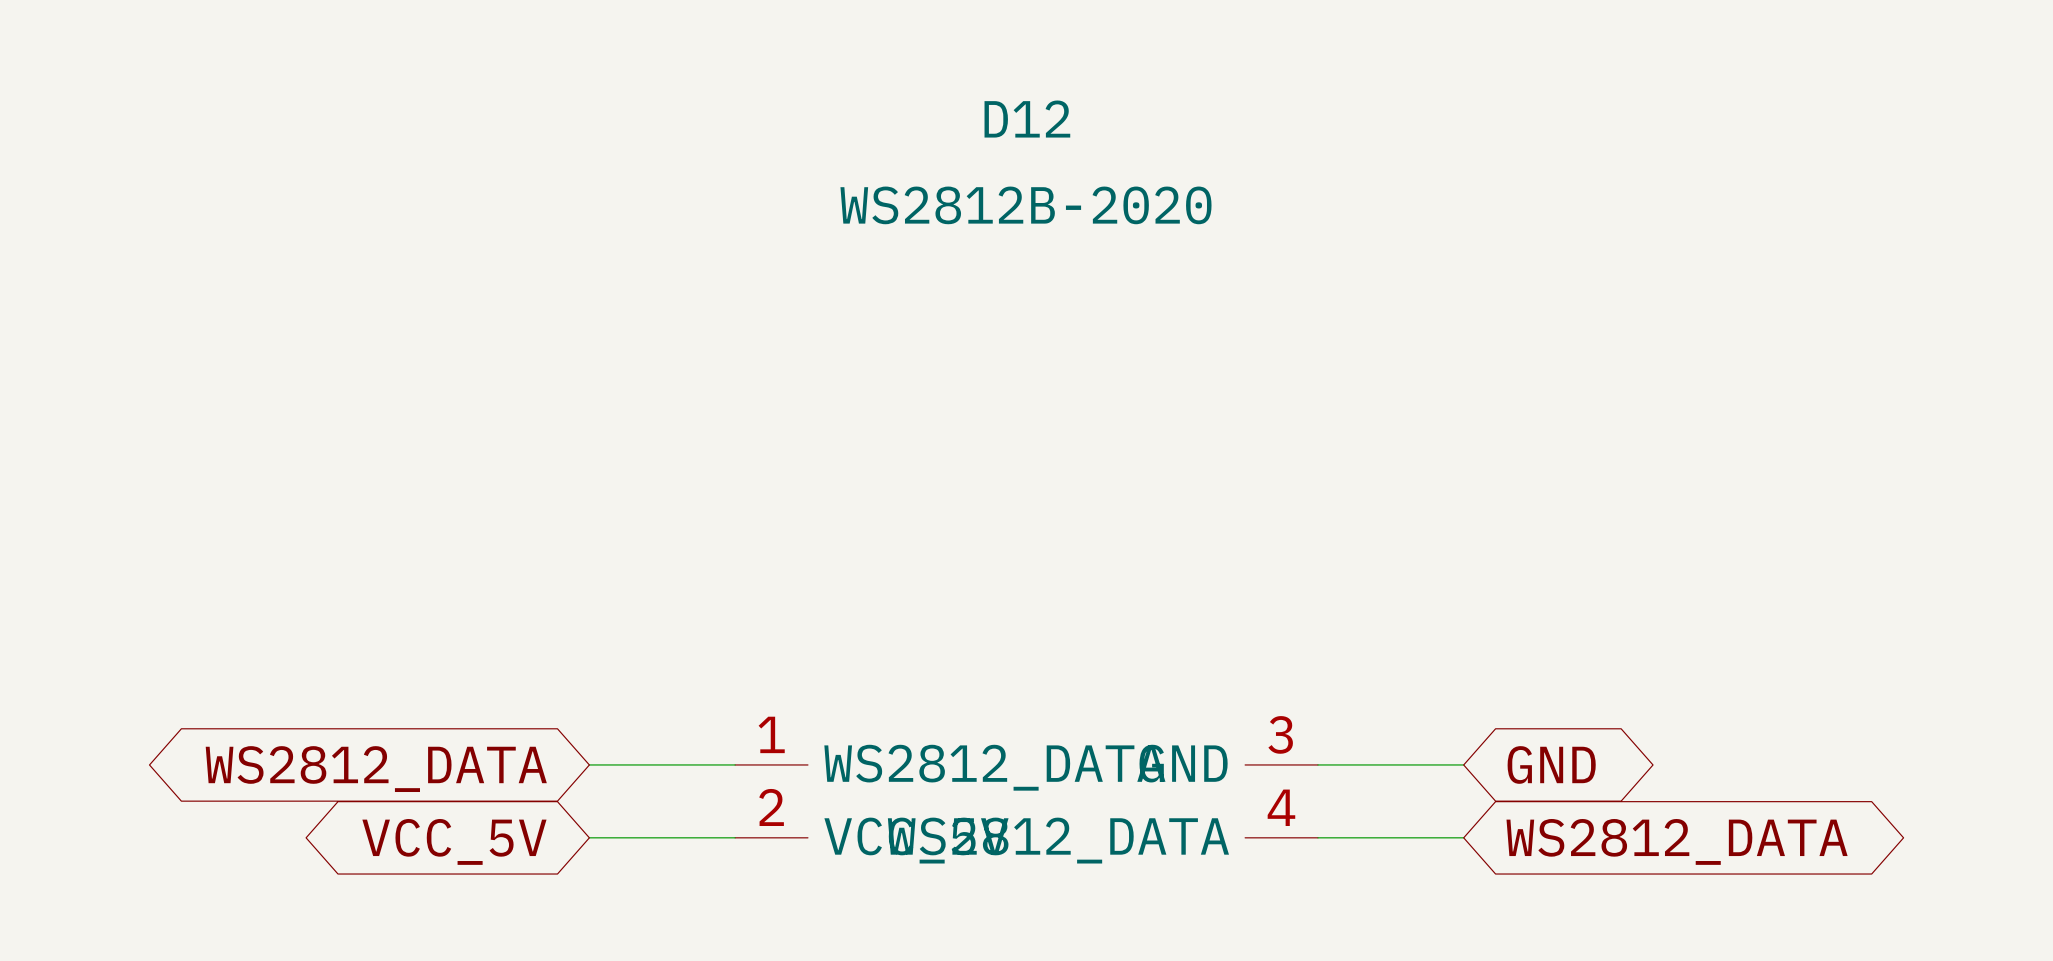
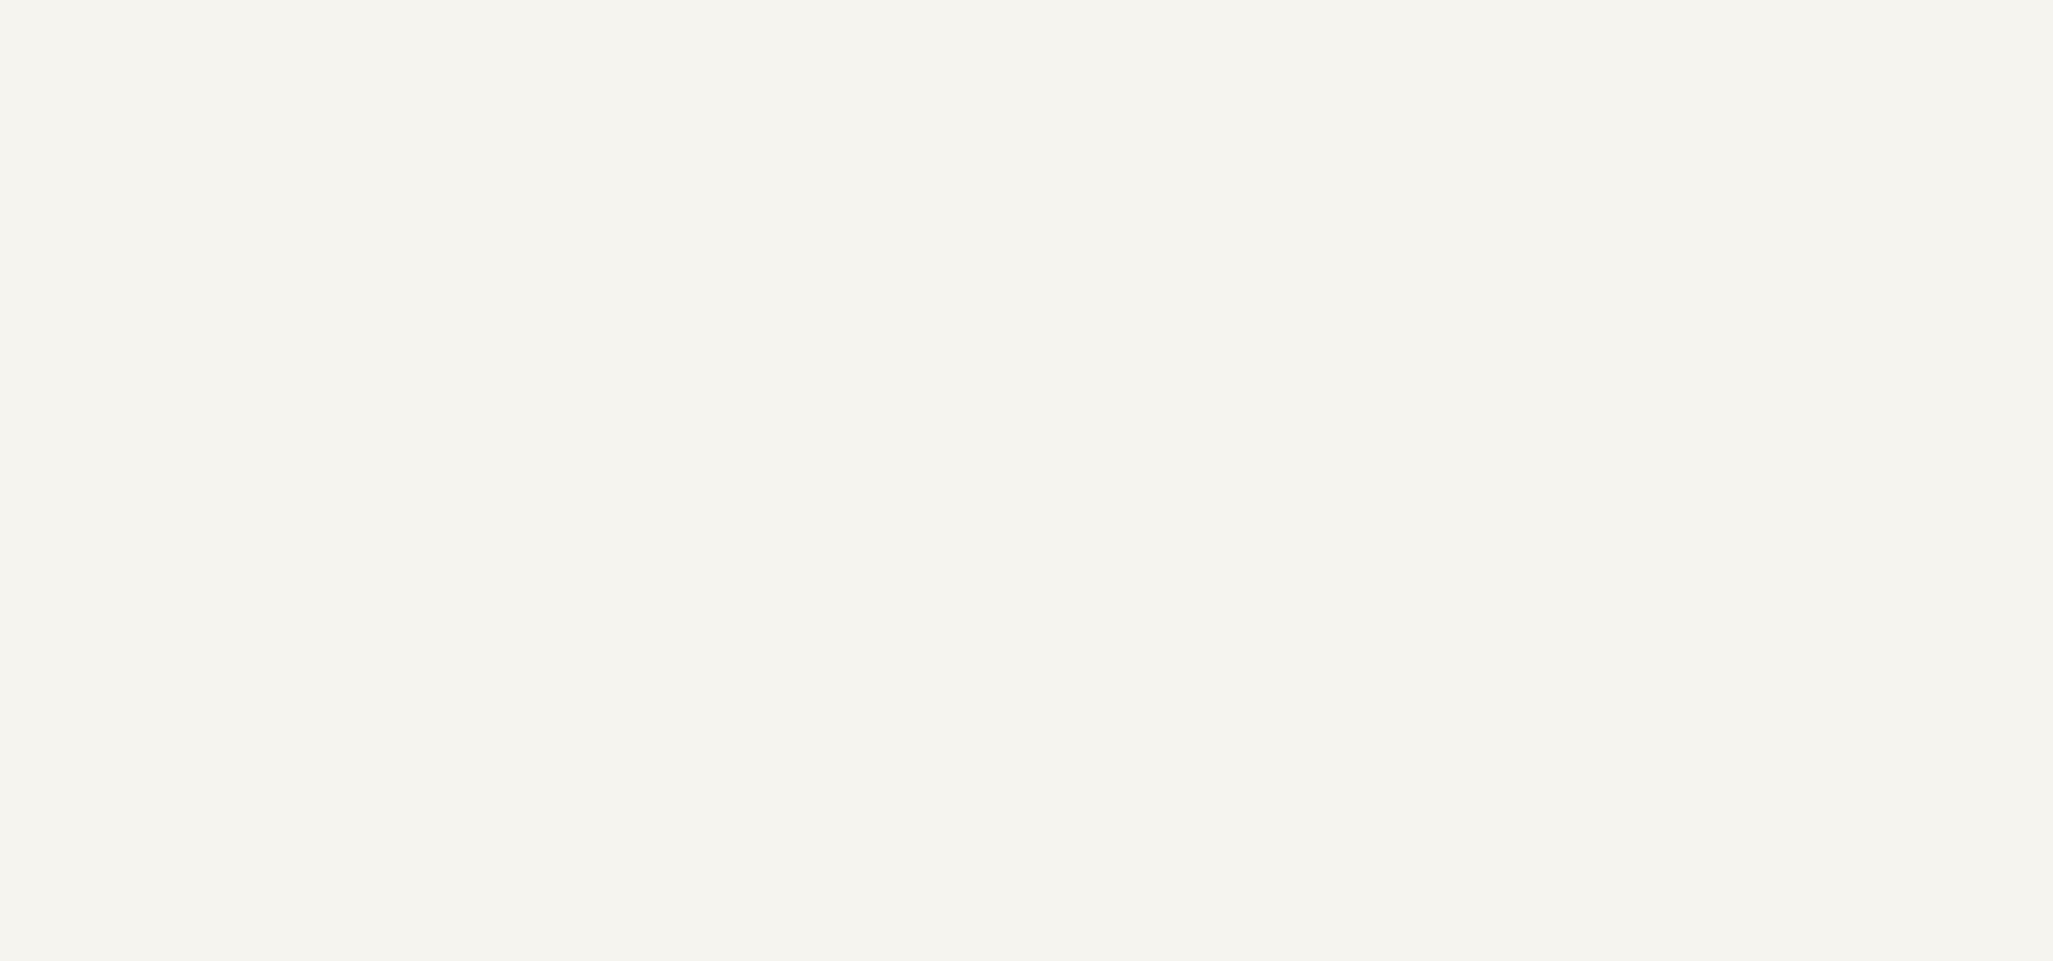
wire: (589, 764) (735, 764) -> none
wire: (1317, 764) (1463, 764) -> none
global label: GND (1551, 764) -> none
global label: WS2812_DATA (376, 769) -> none
D12: WS2812B-2020 (1026, 801) -> none
wire: (589, 837) (735, 837) -> none
wire: (1317, 837) (1463, 837) -> none
global label: VCC_5V (454, 841) -> none
global label: WS2812_DATA (1677, 841) -> none

